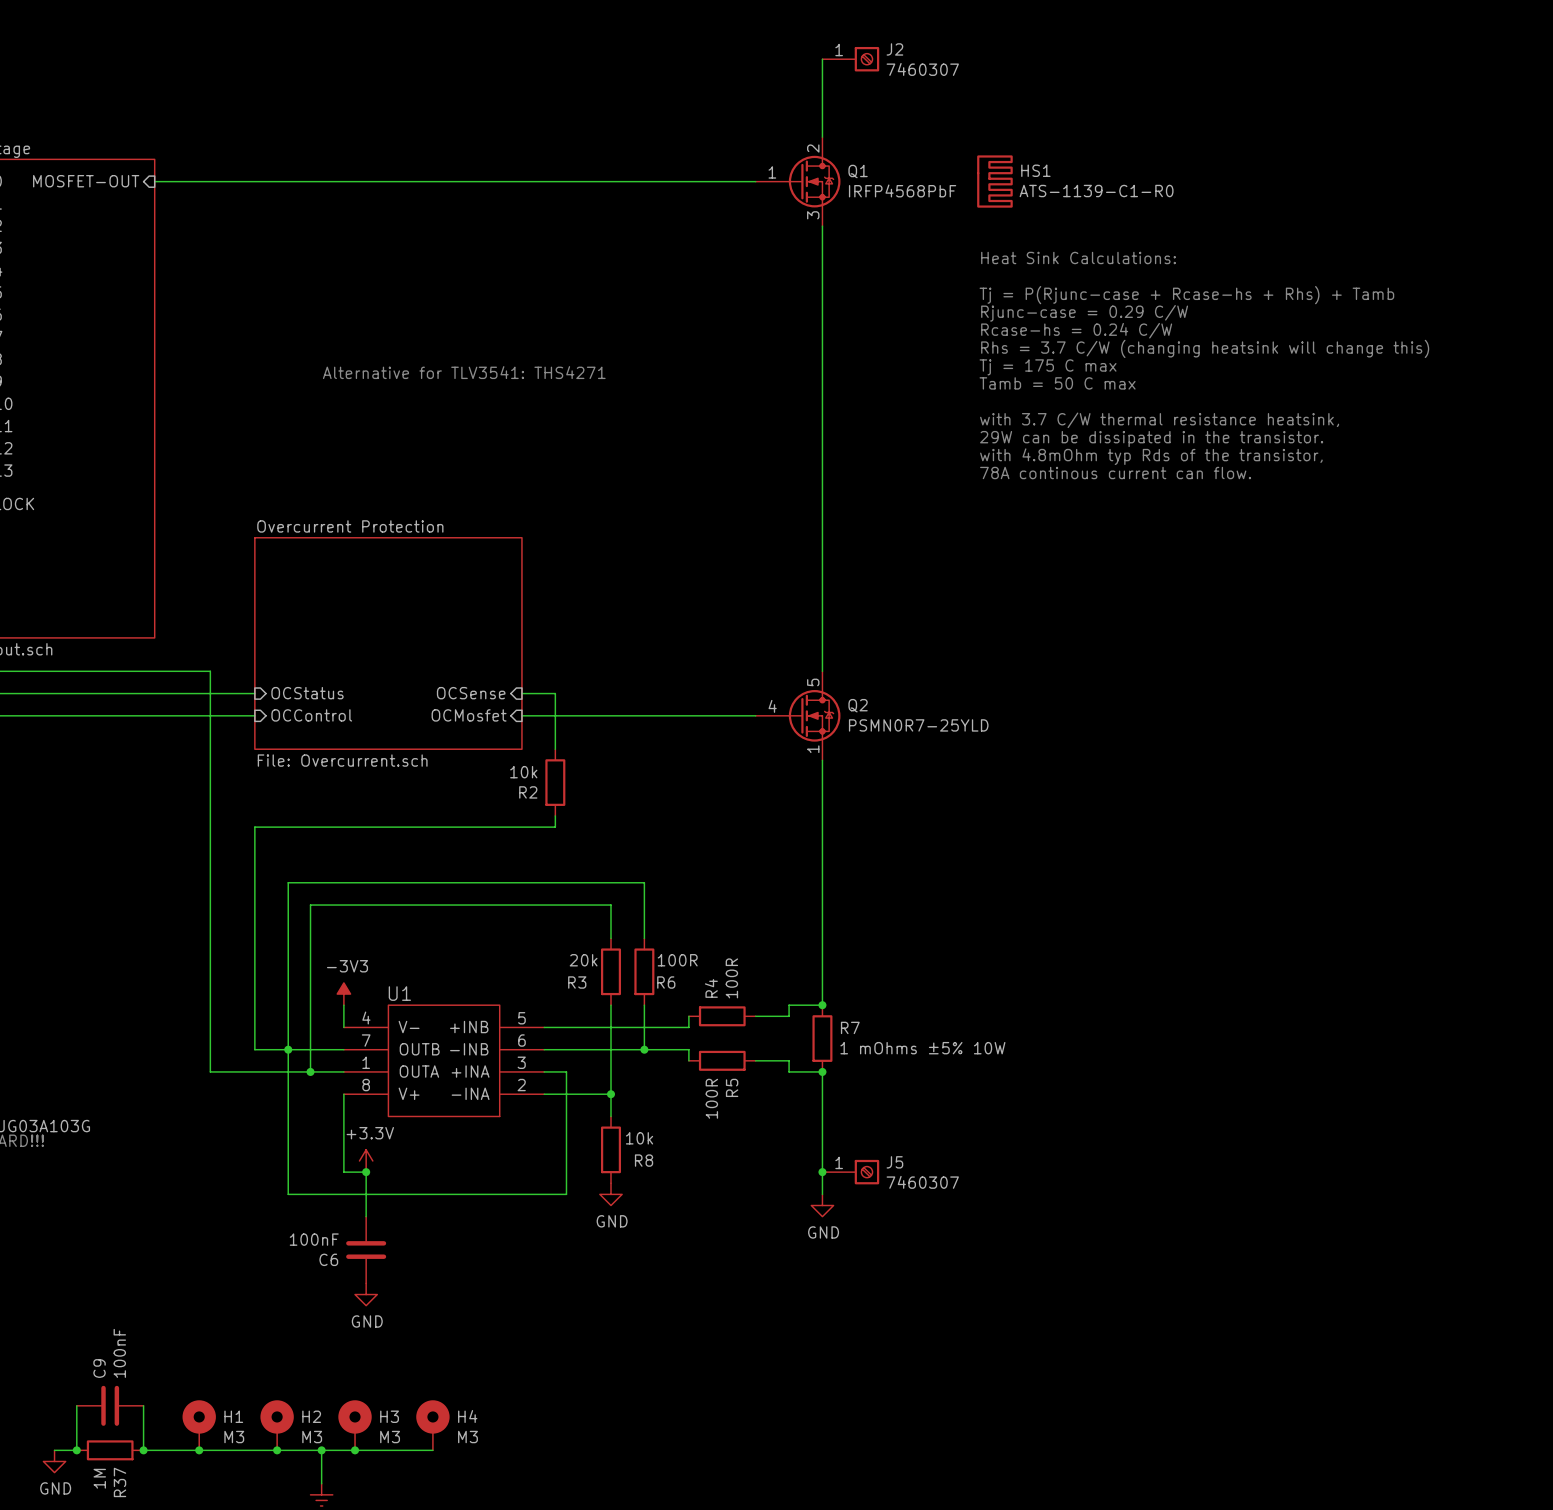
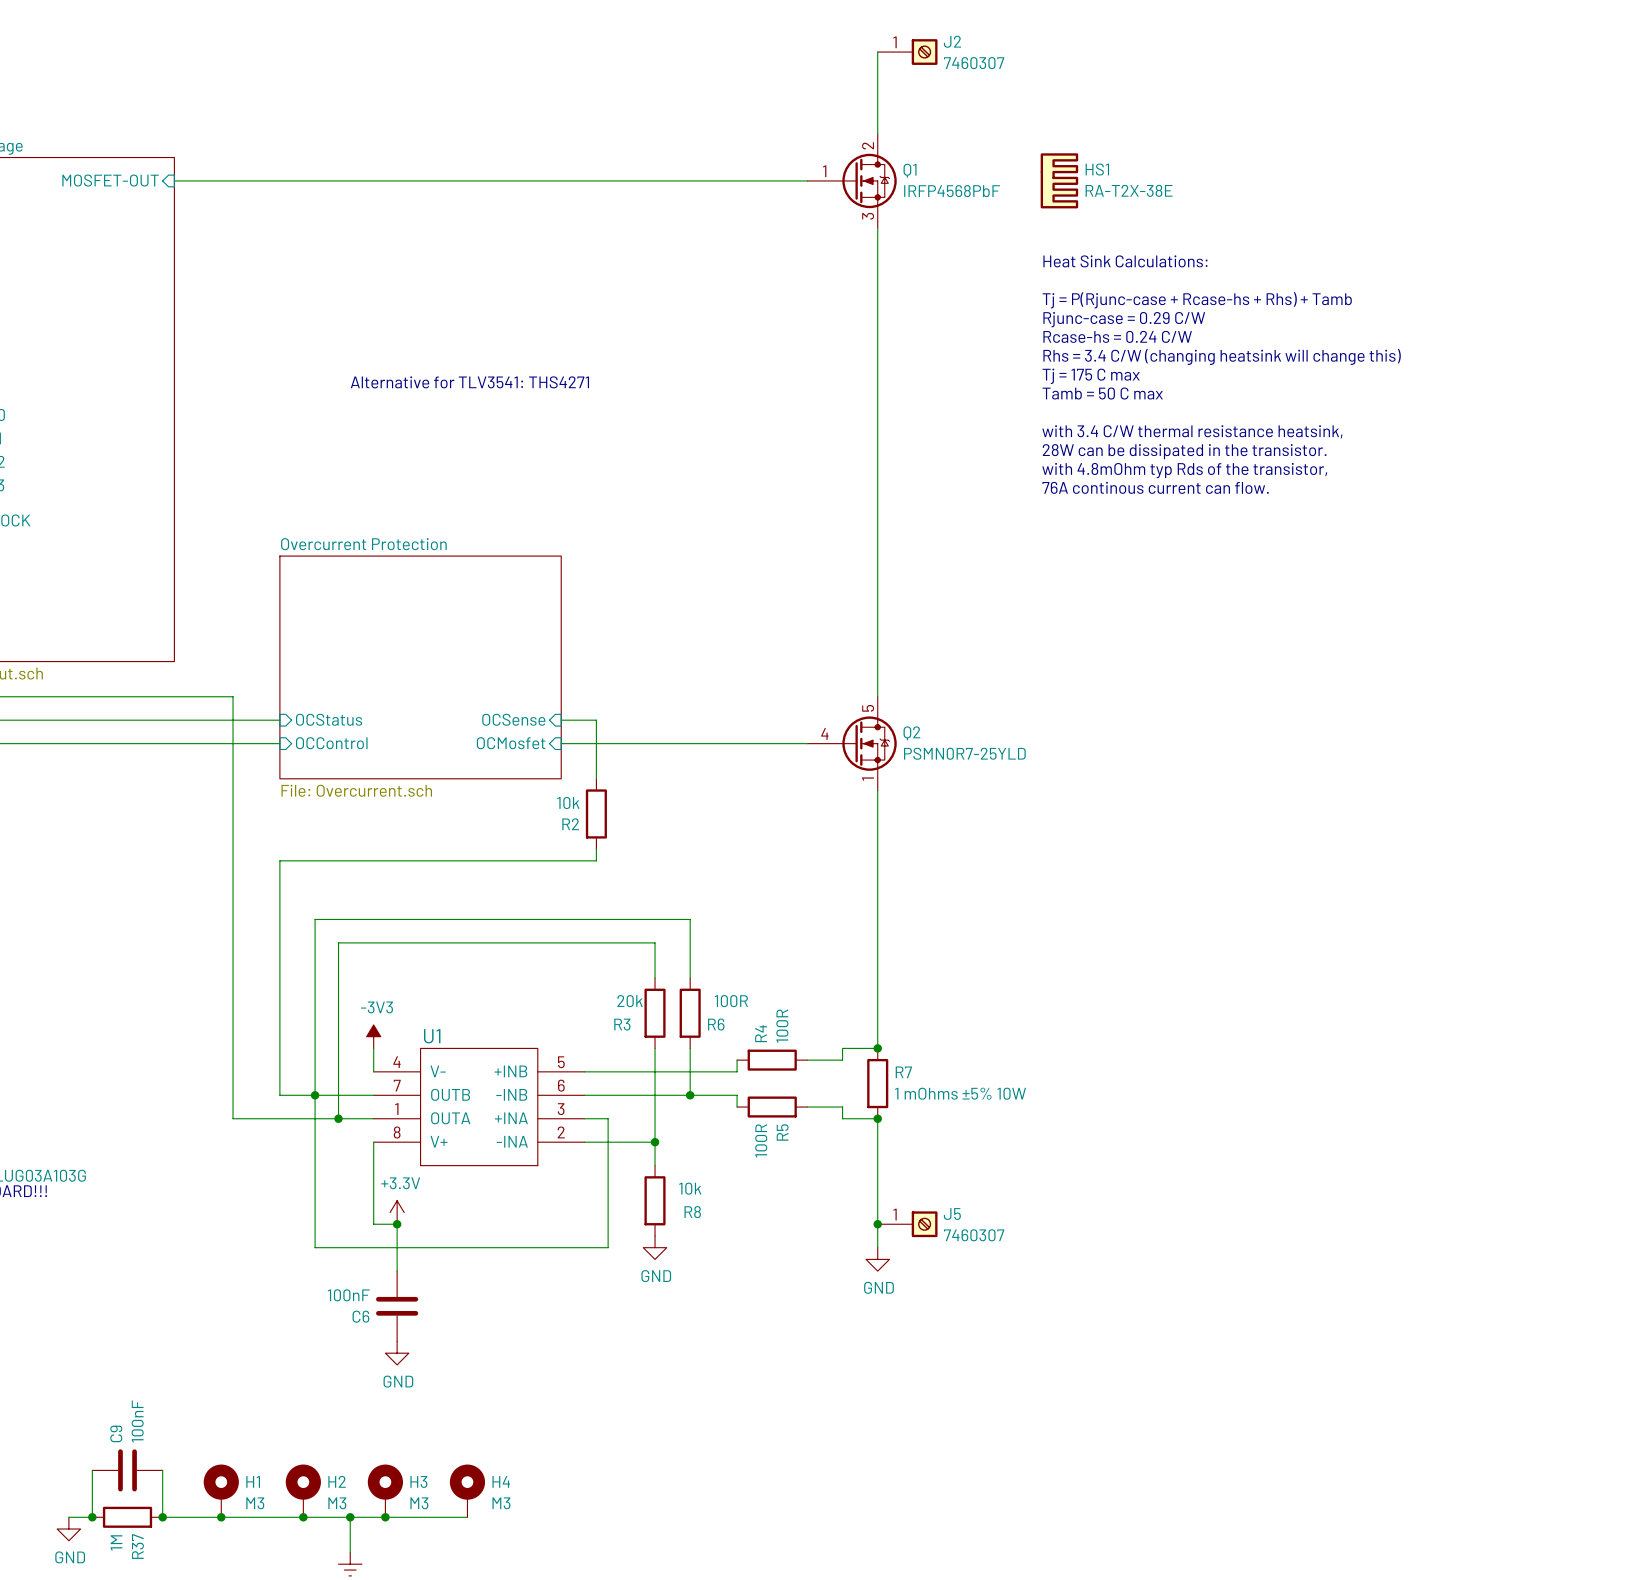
HS1 value: ATS-1139-C1-R0 (1096, 191) -> RA-T2X-38E (1129, 190)
text: Rhs = 3.7 C/W (changing heatsink will change this) (1205, 348) -> Rhs = 3.4 C/W (changing heatsink will change this) (1222, 356)
text: with 3.7 C/W thermal resistance heatsink, (1159, 420) -> with 3.4 C/W thermal resistance heatsink, (1192, 431)
text: 29W can be dissipated in the transistor. (1151, 439) -> 28W can be dissipated in the transistor. (1184, 451)
text: 78A continous current can flow. (1115, 473) -> 76A continous current can flow. (1155, 487)

